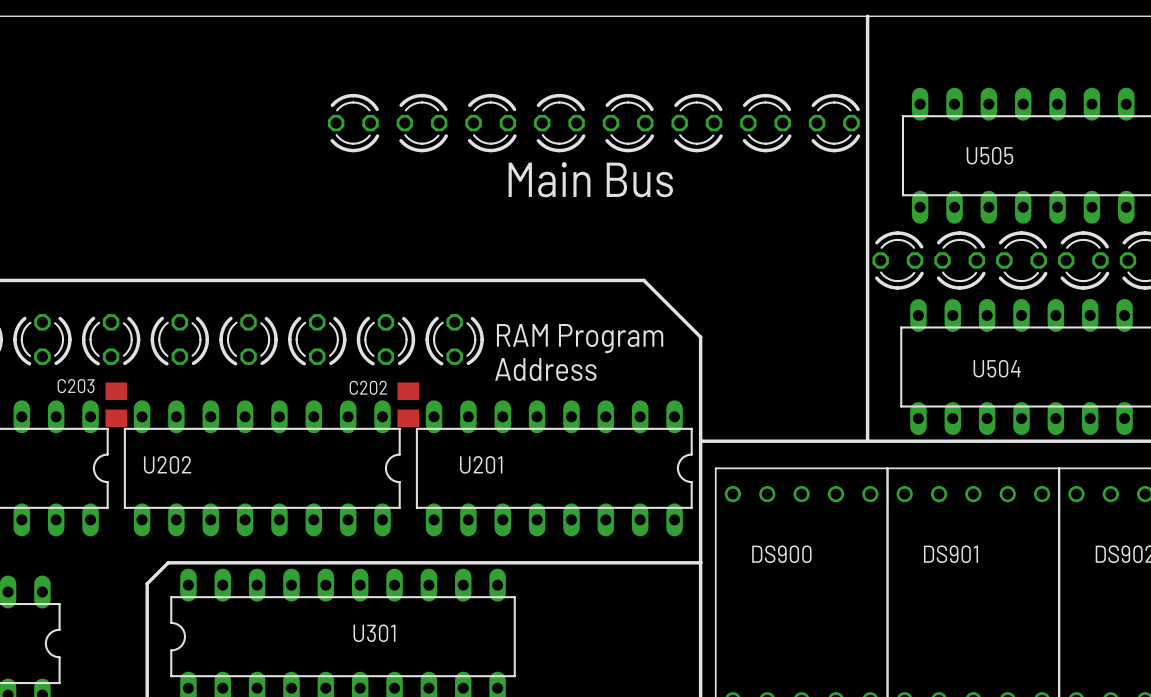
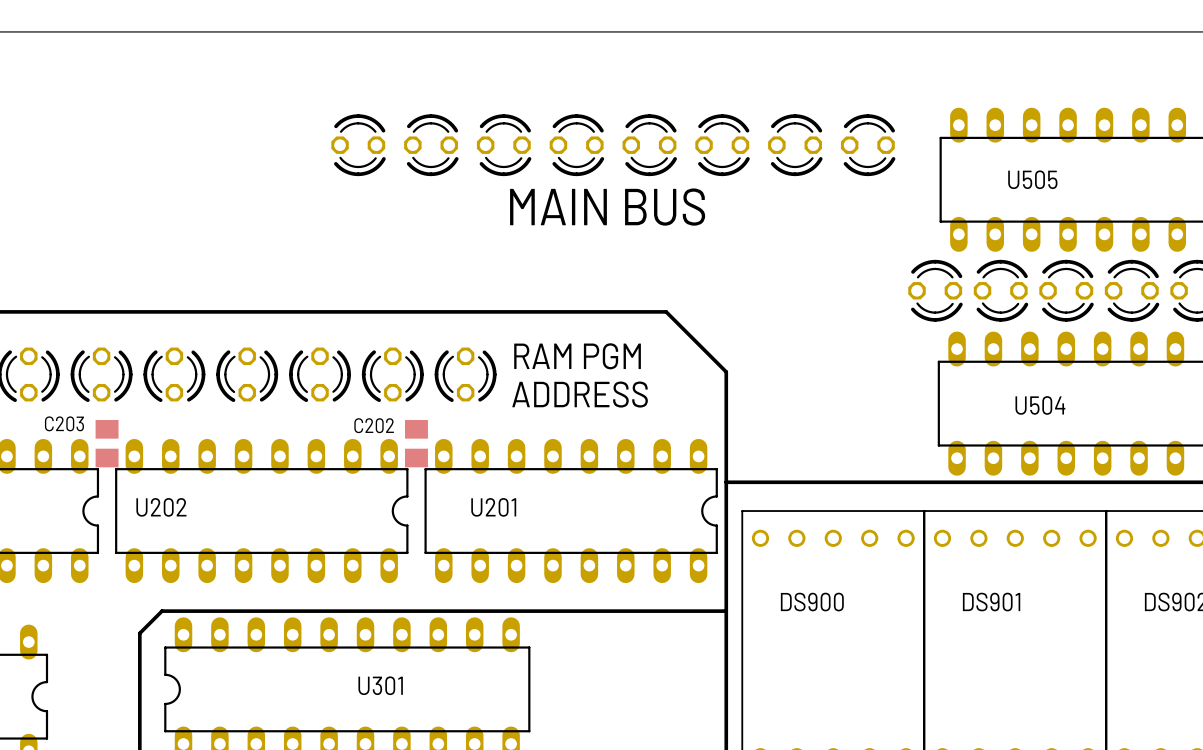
line: (867, 16) (867, 439) -> none
text: Main Bus (590, 179) -> MAIN BUS (607, 207)
text: none -> RAM PGM (577, 356)
text: RAM Program (580, 338) -> none
text: Address (545, 369) -> ADDRESS (580, 394)

